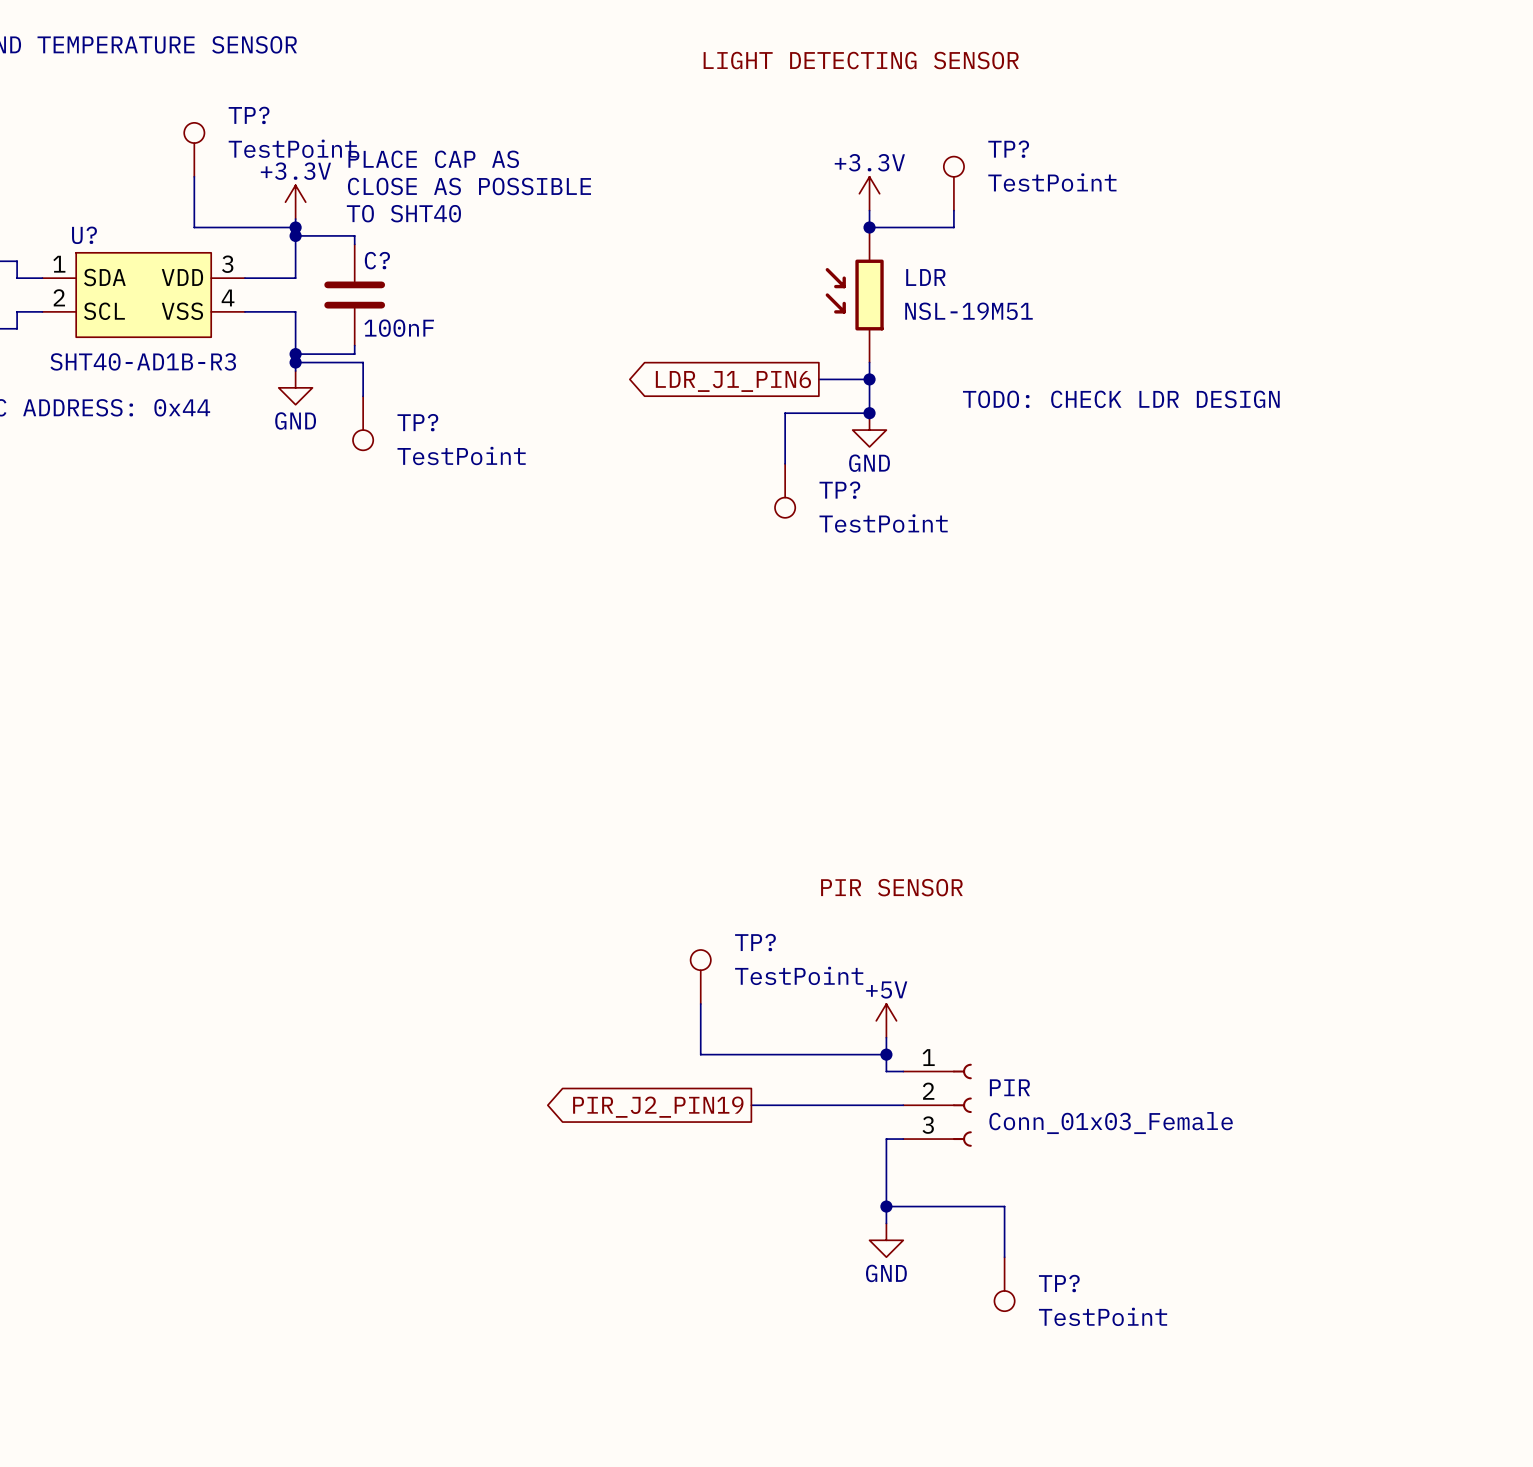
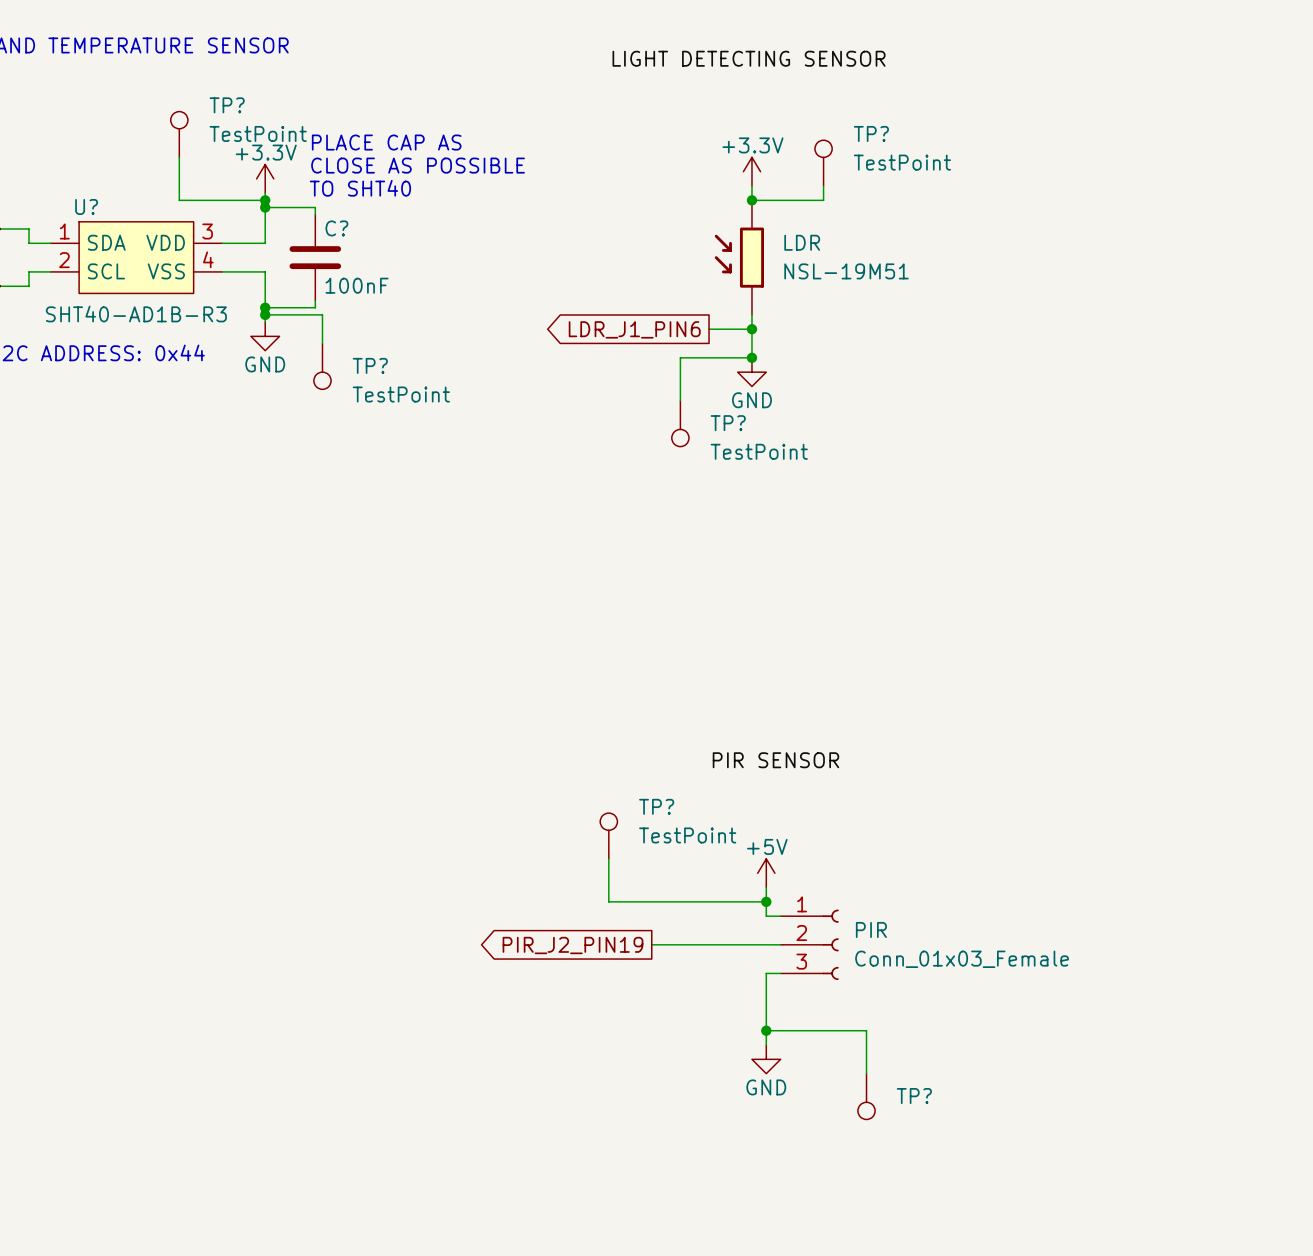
text: TODO: CHECK LDR DESIGN (1121, 399) -> none
TP? value: TestPoint (1103, 1316) -> none

